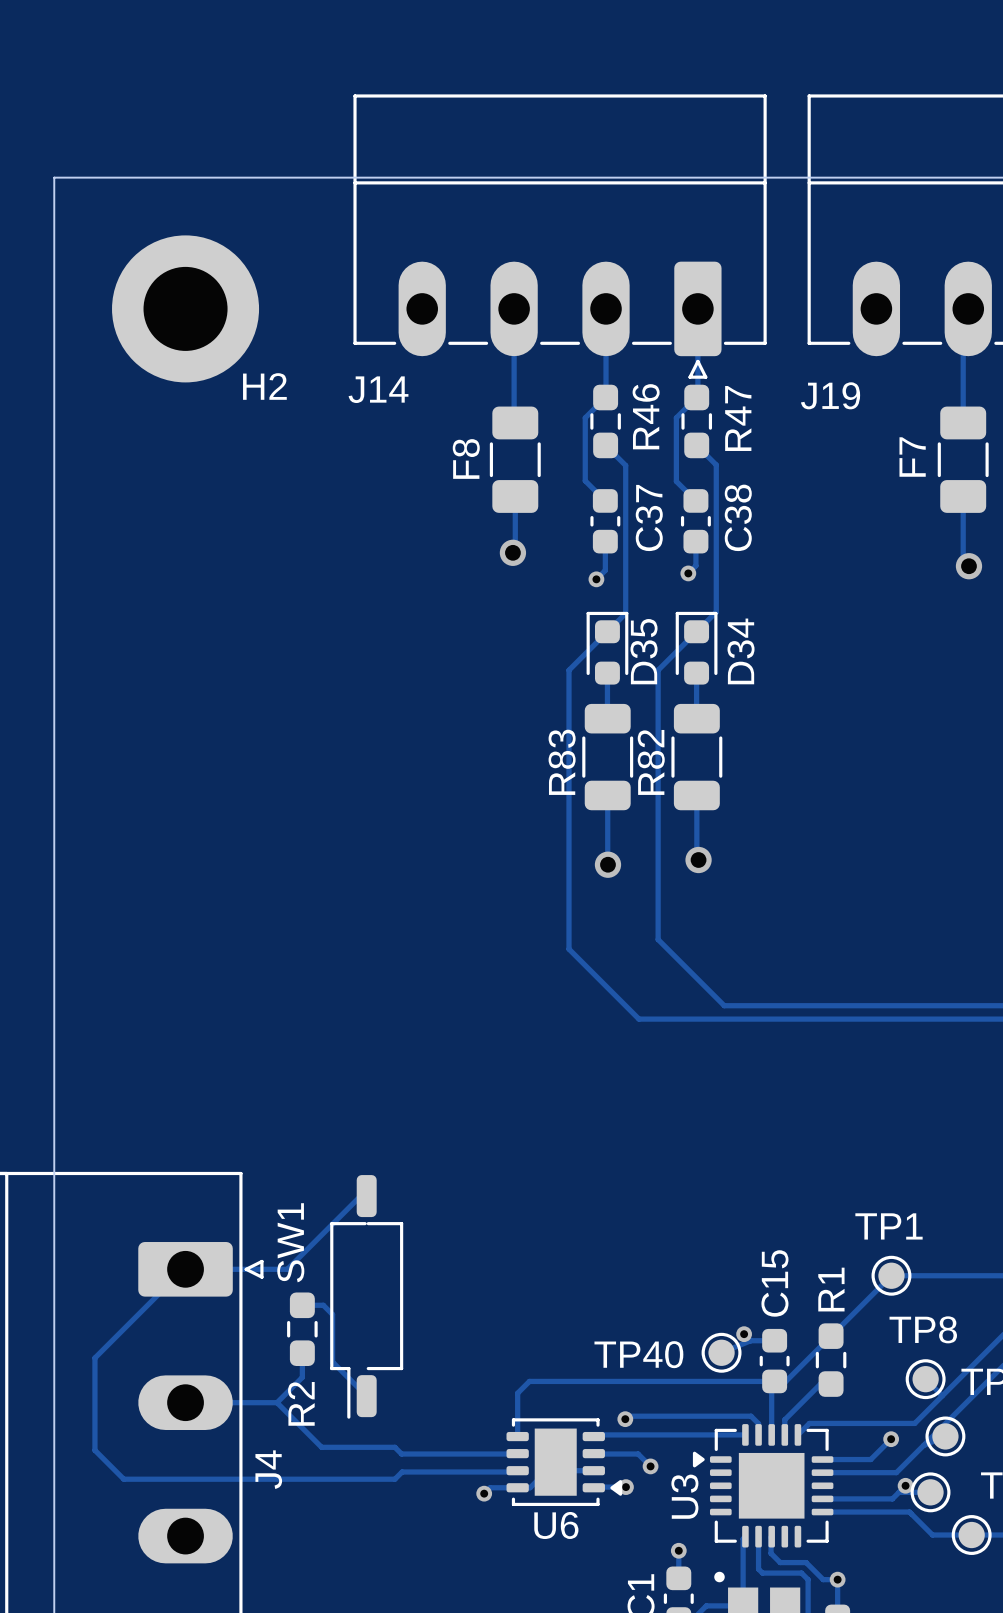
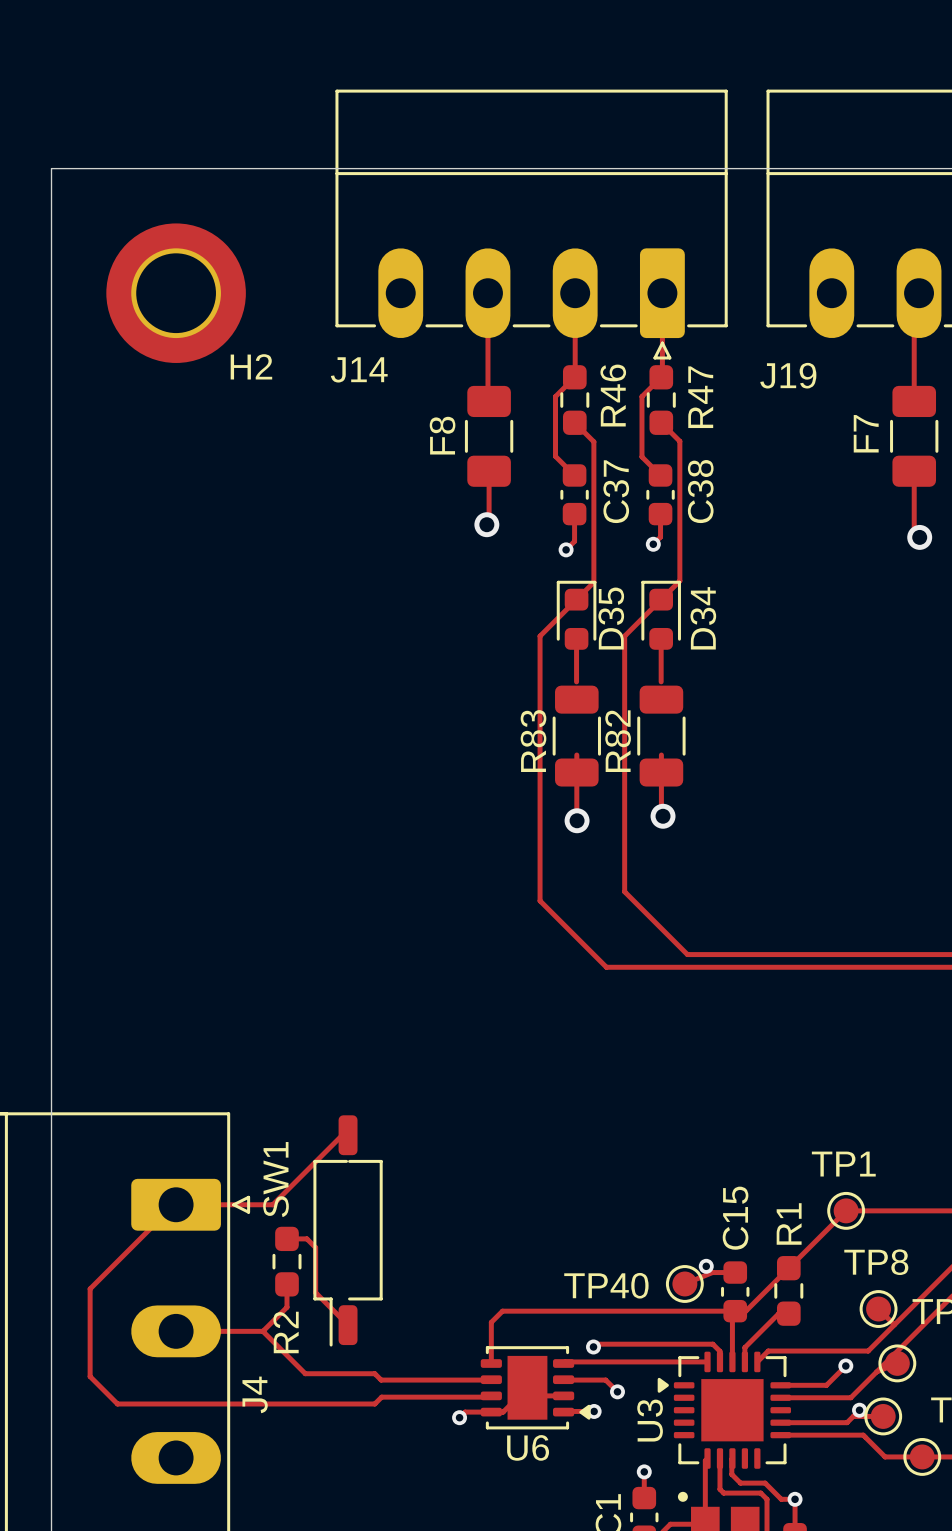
R83 position: (607, 757) -> (576, 736)
R82 position: (696, 757) -> (661, 736)

